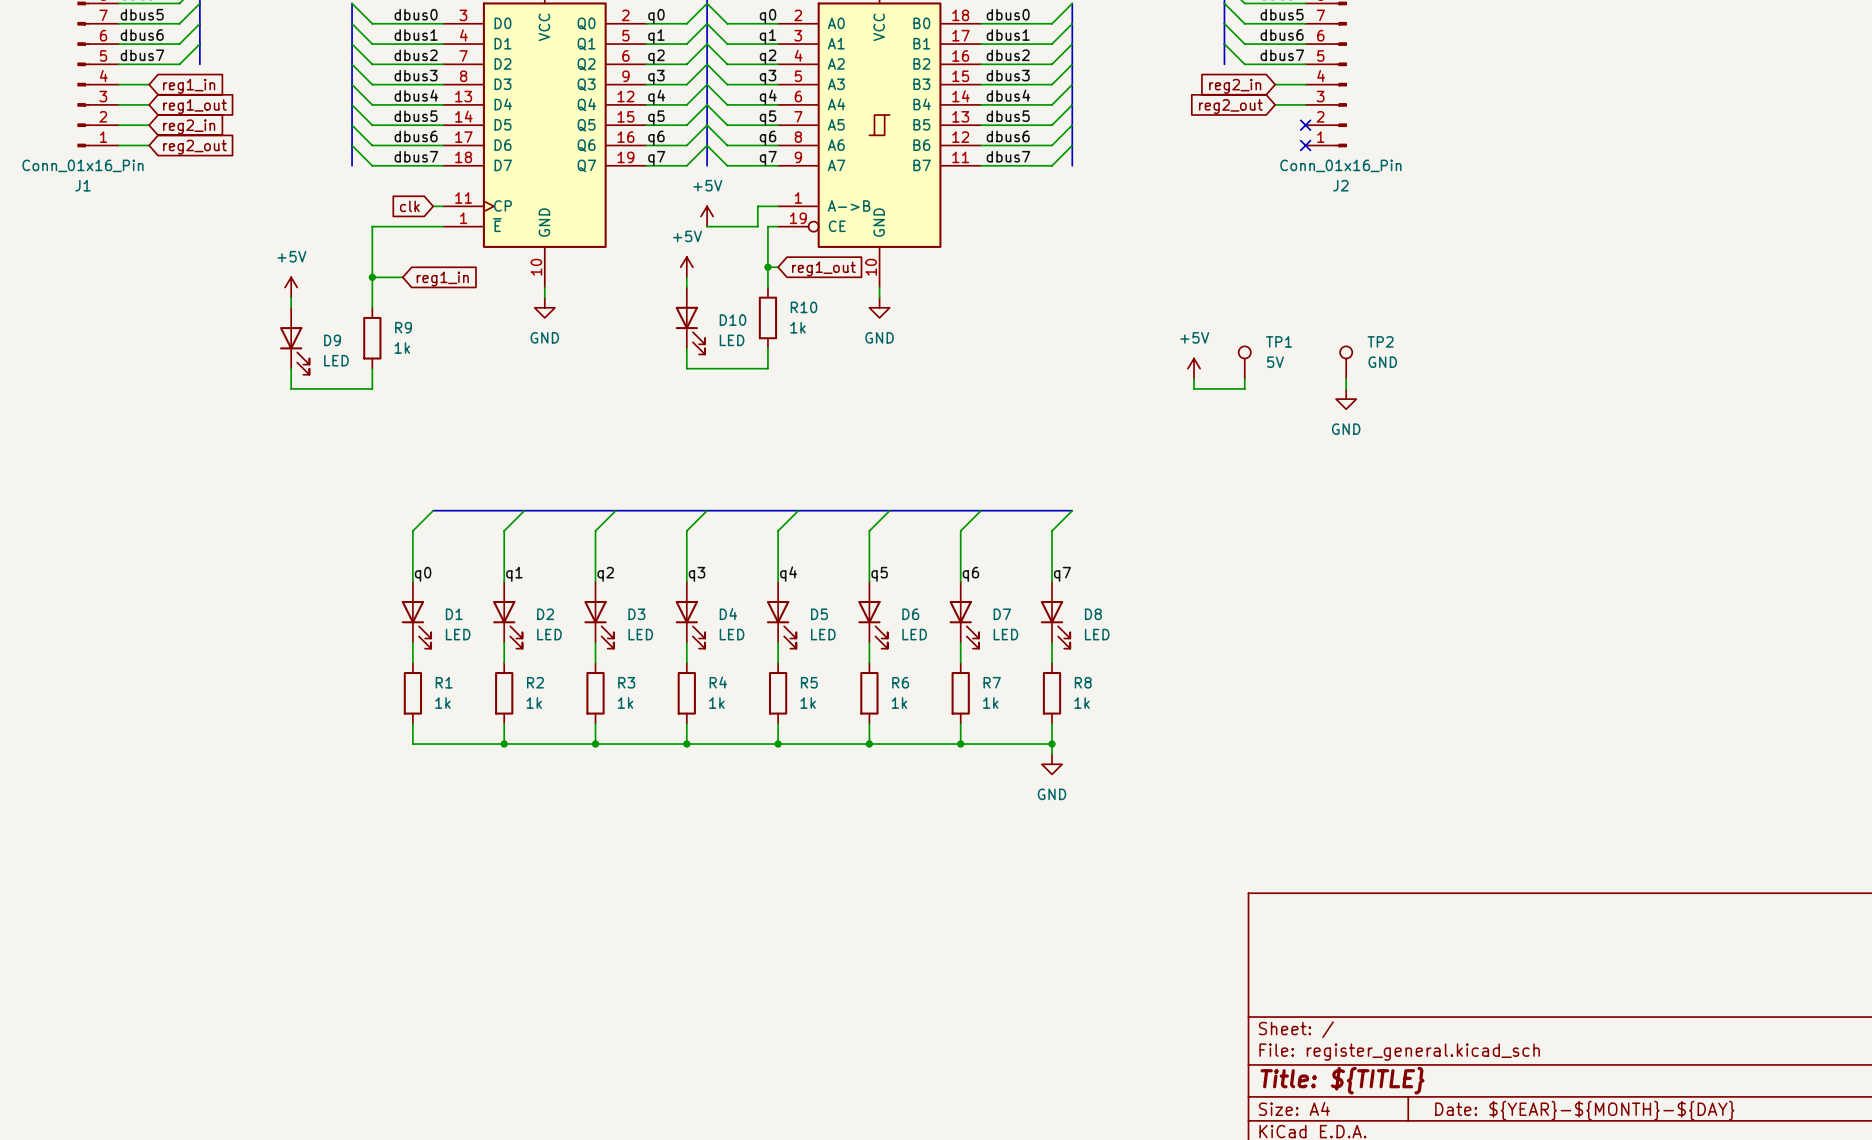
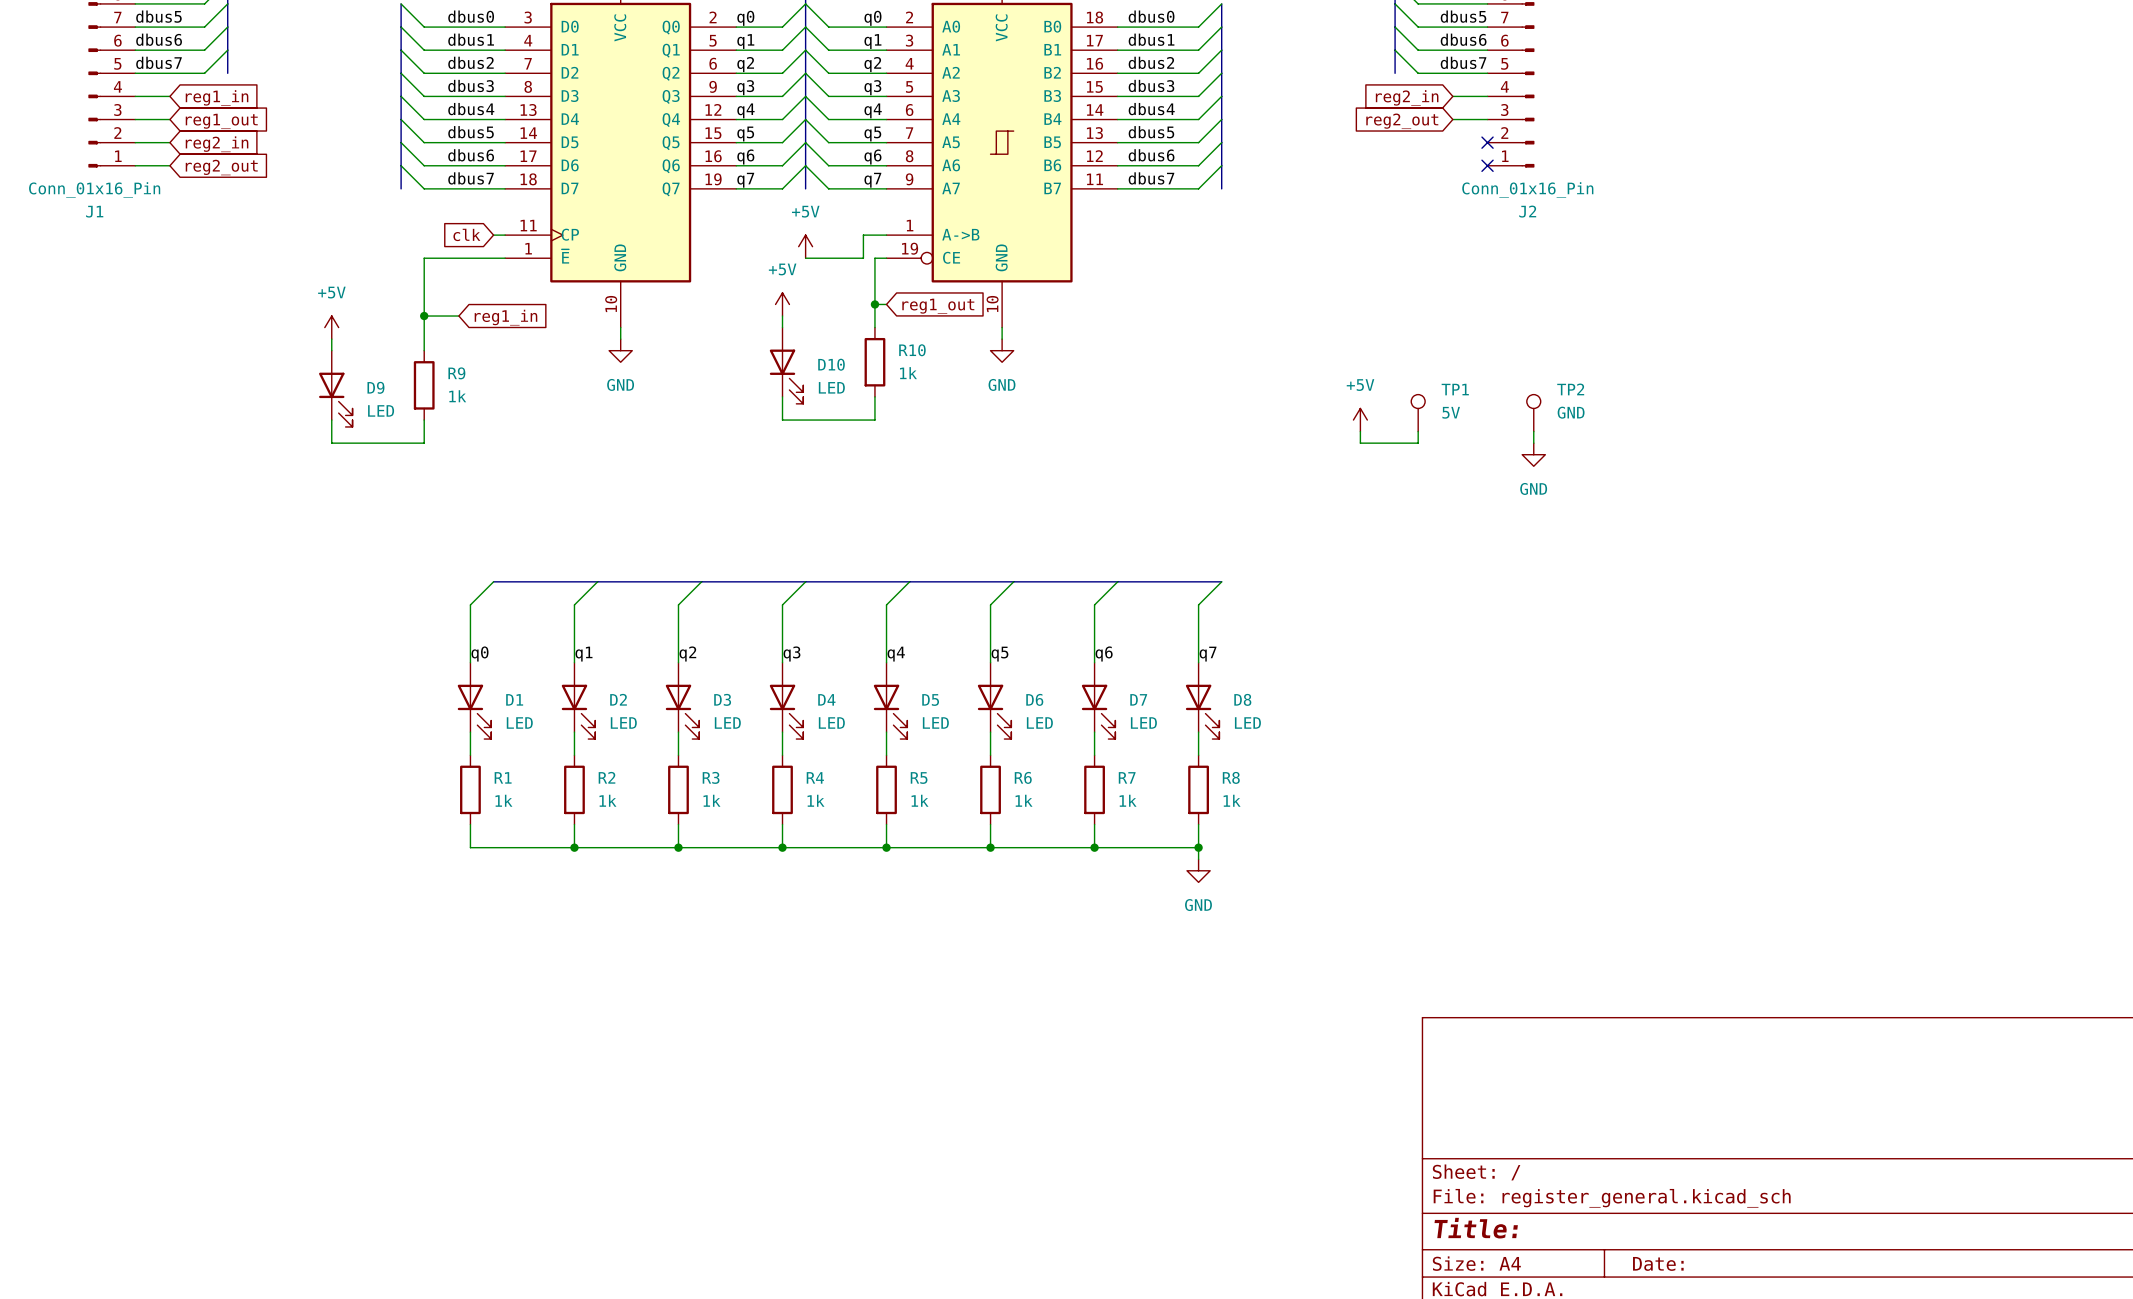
title block: Title: ${TITLE} (1342, 1080) -> Title: (1476, 1228)
title block: Date: ${YEAR}-${MONTH}-${DAY} (1584, 1110) -> Date: (1658, 1263)

